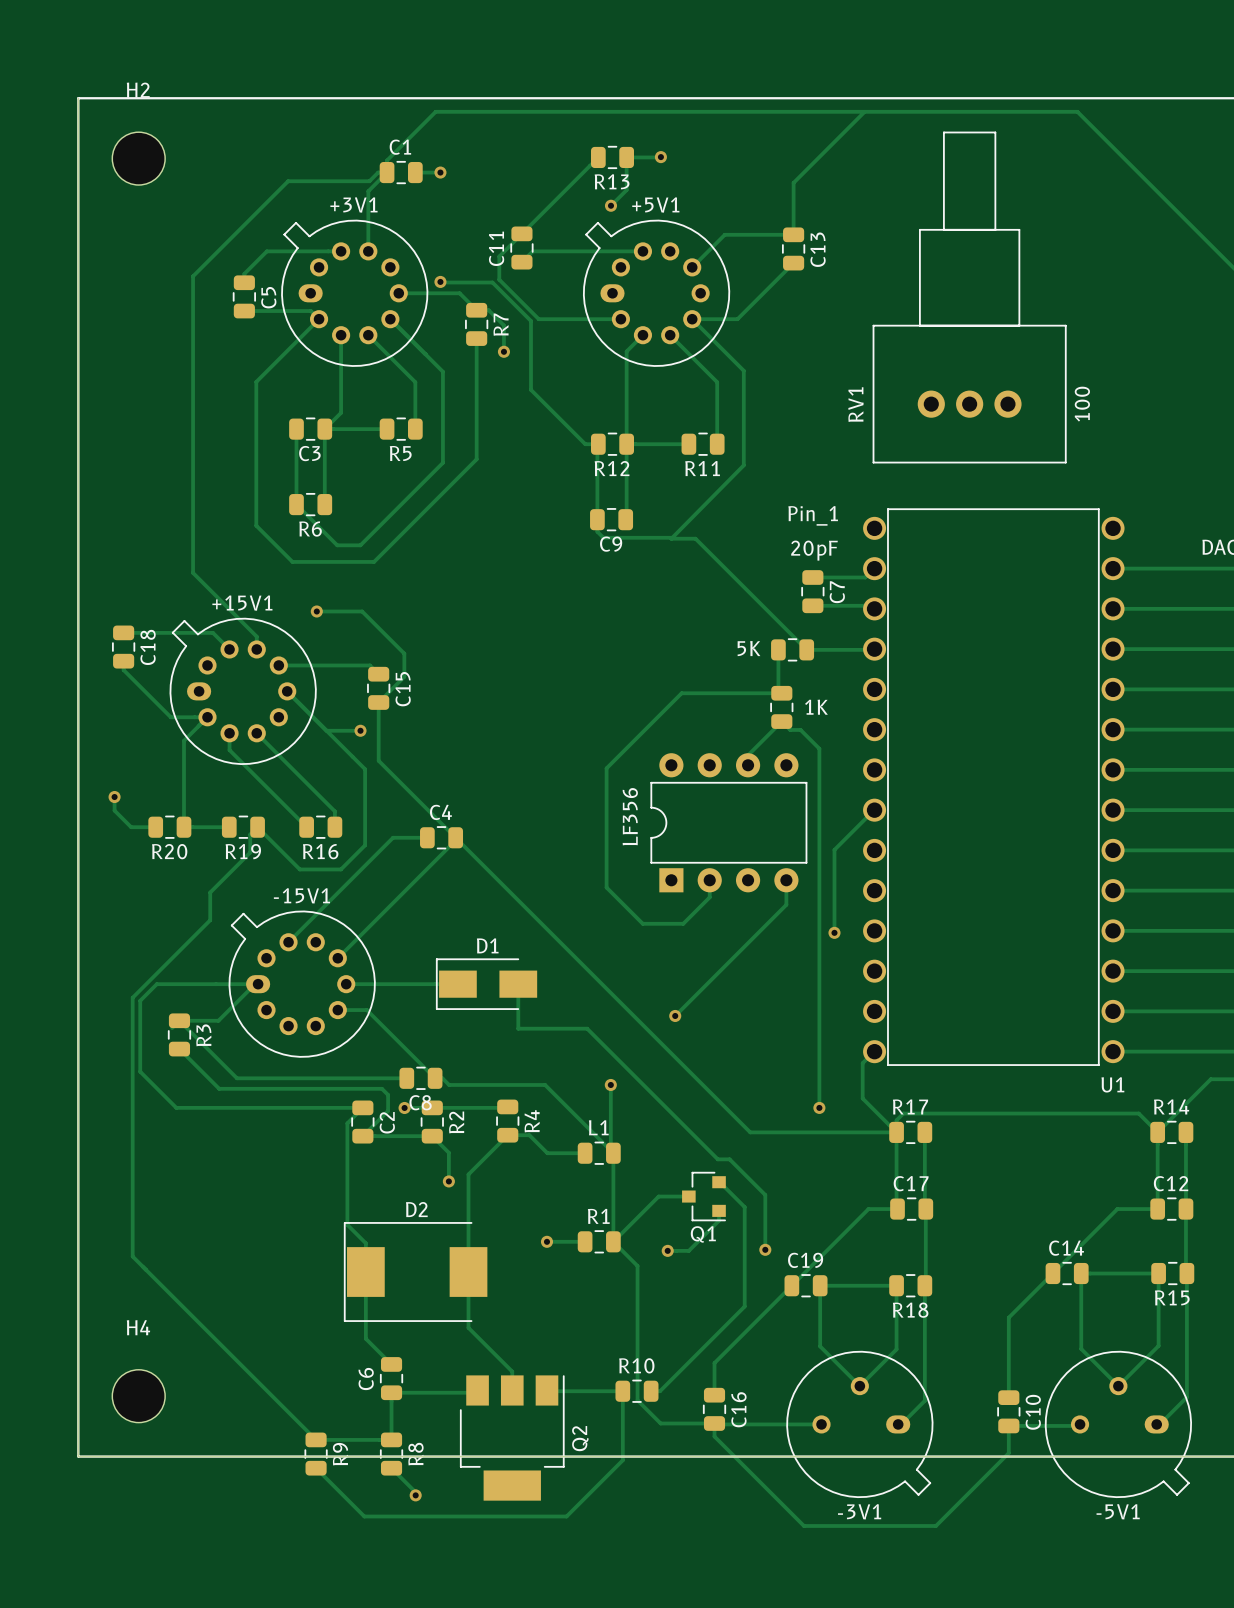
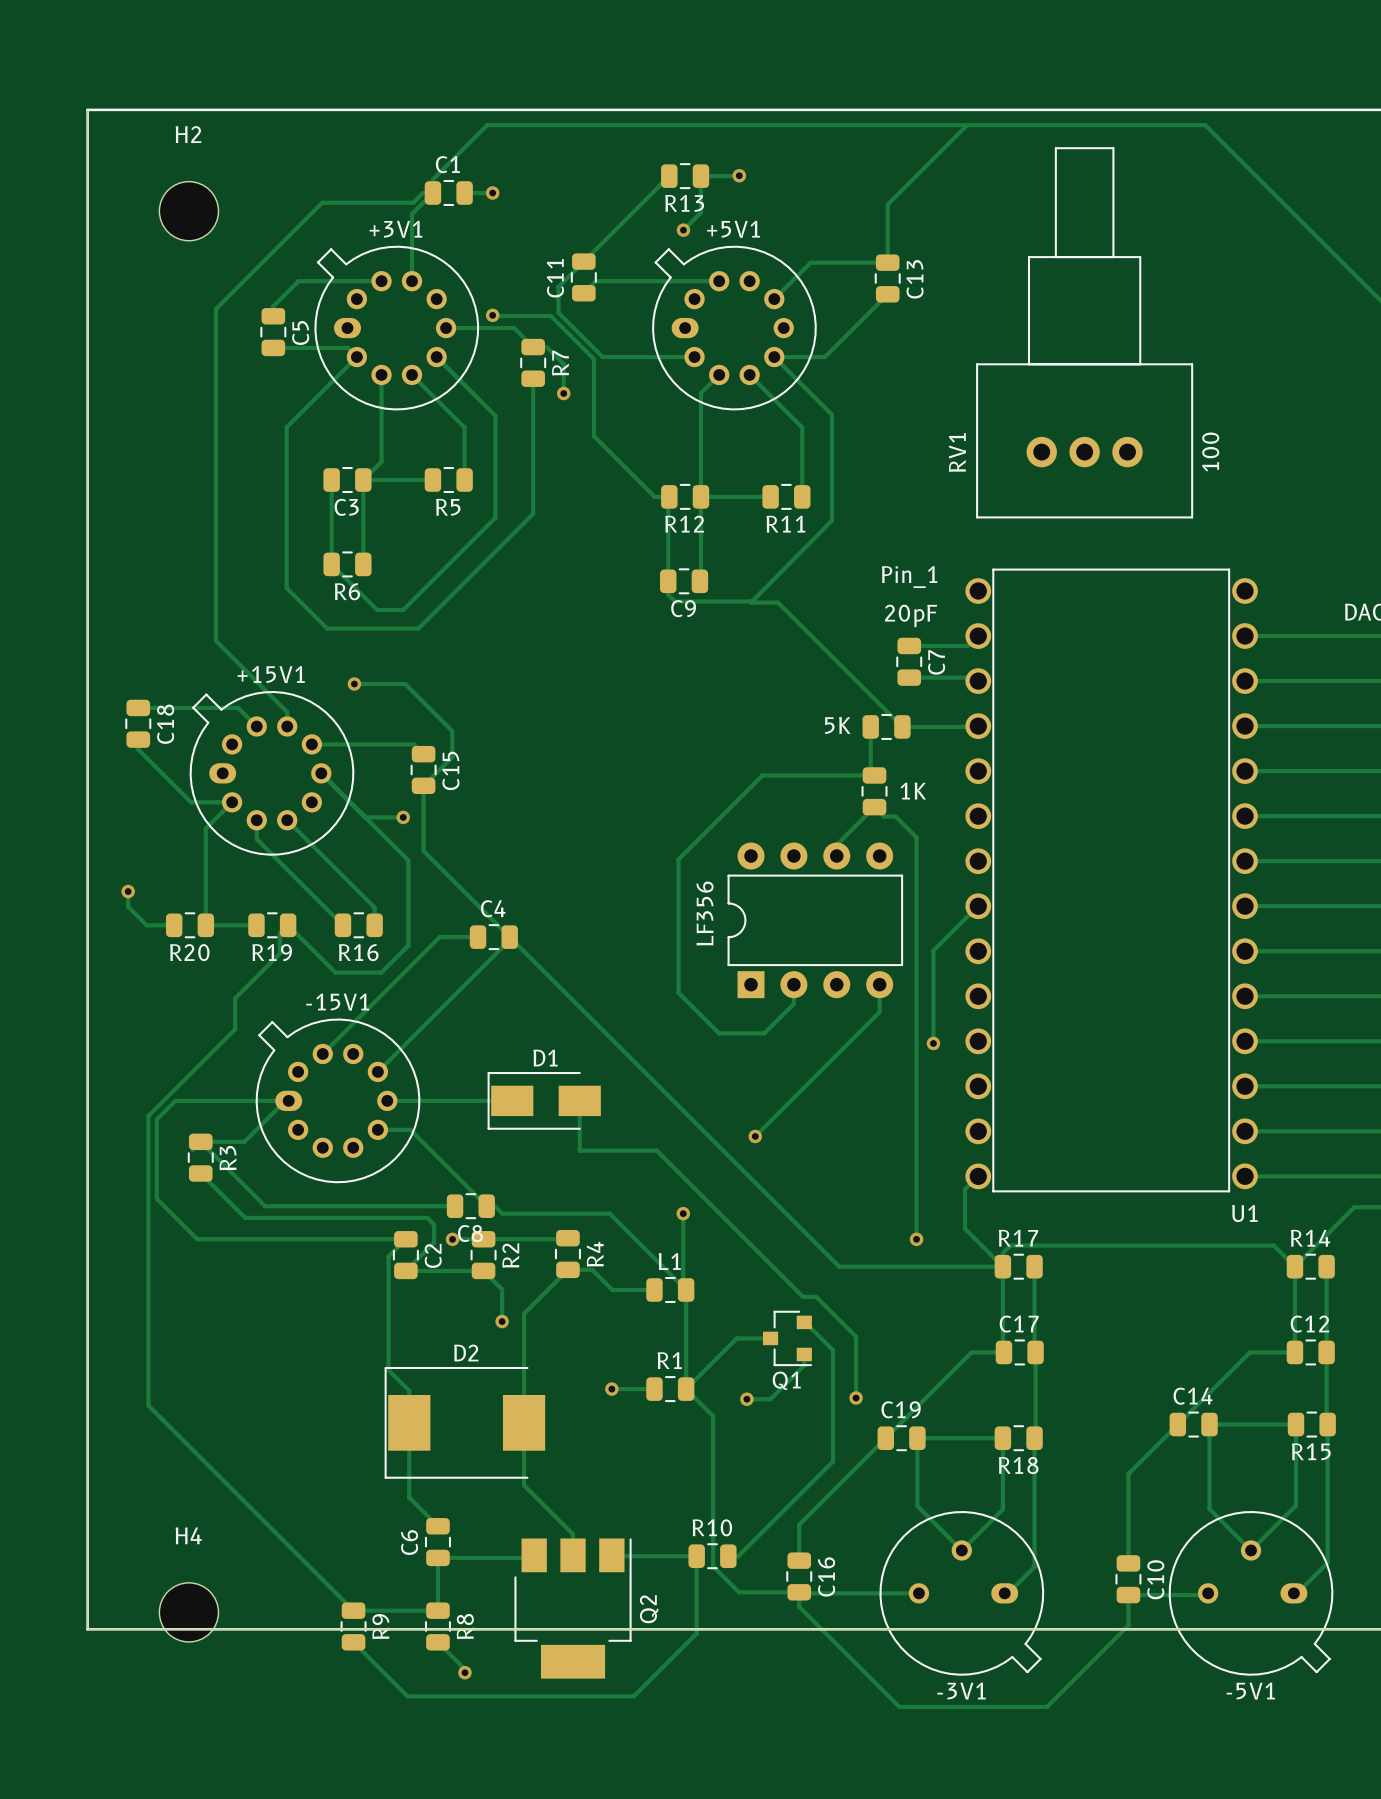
H2 position: (138, 158) -> (188, 211)
H4 position: (138, 1396) -> (188, 1612)

